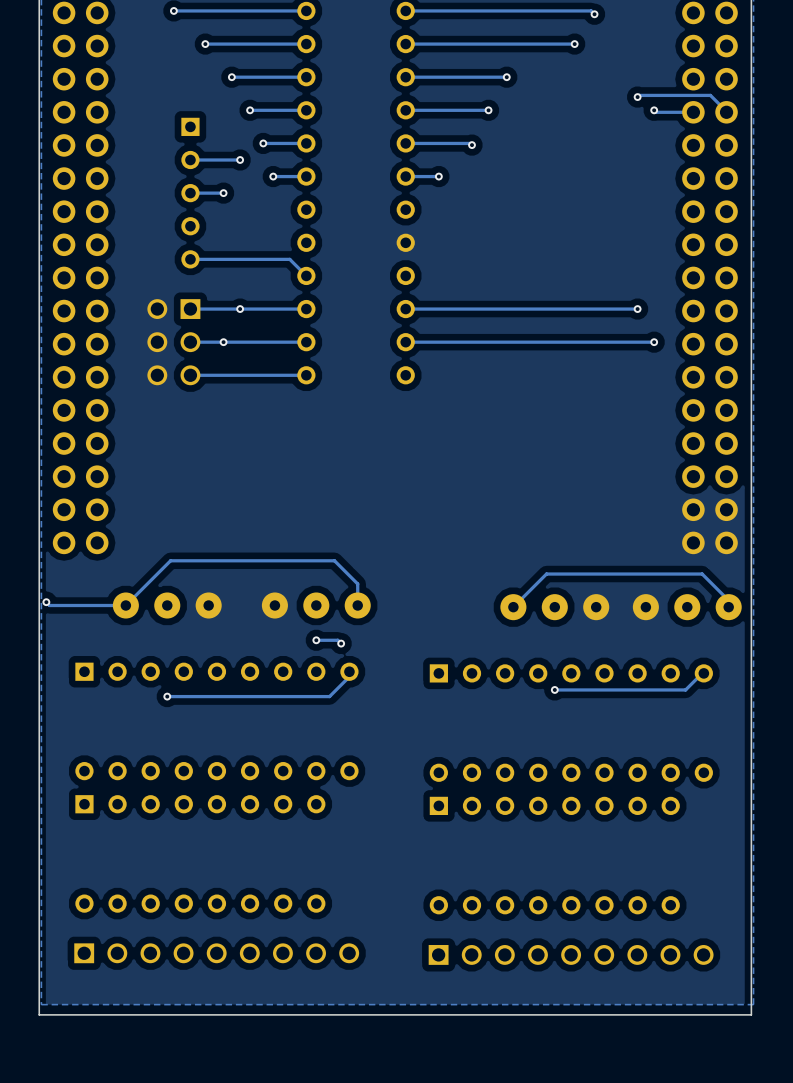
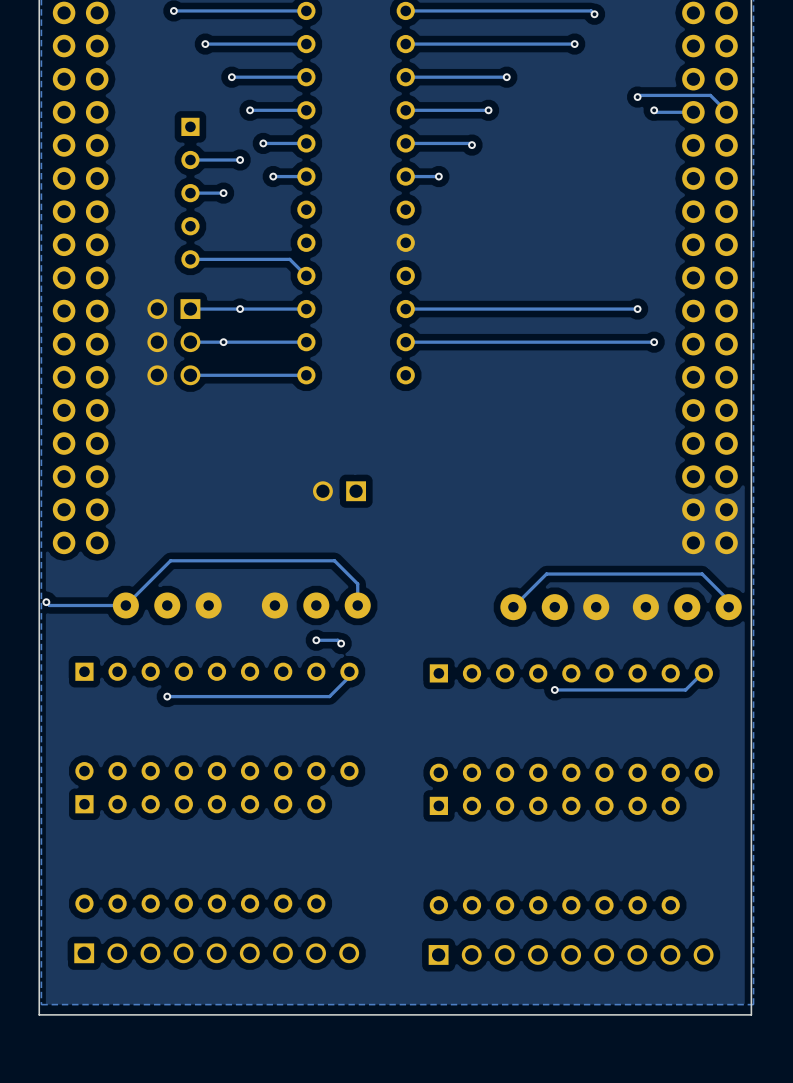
part: none -> (339, 491)

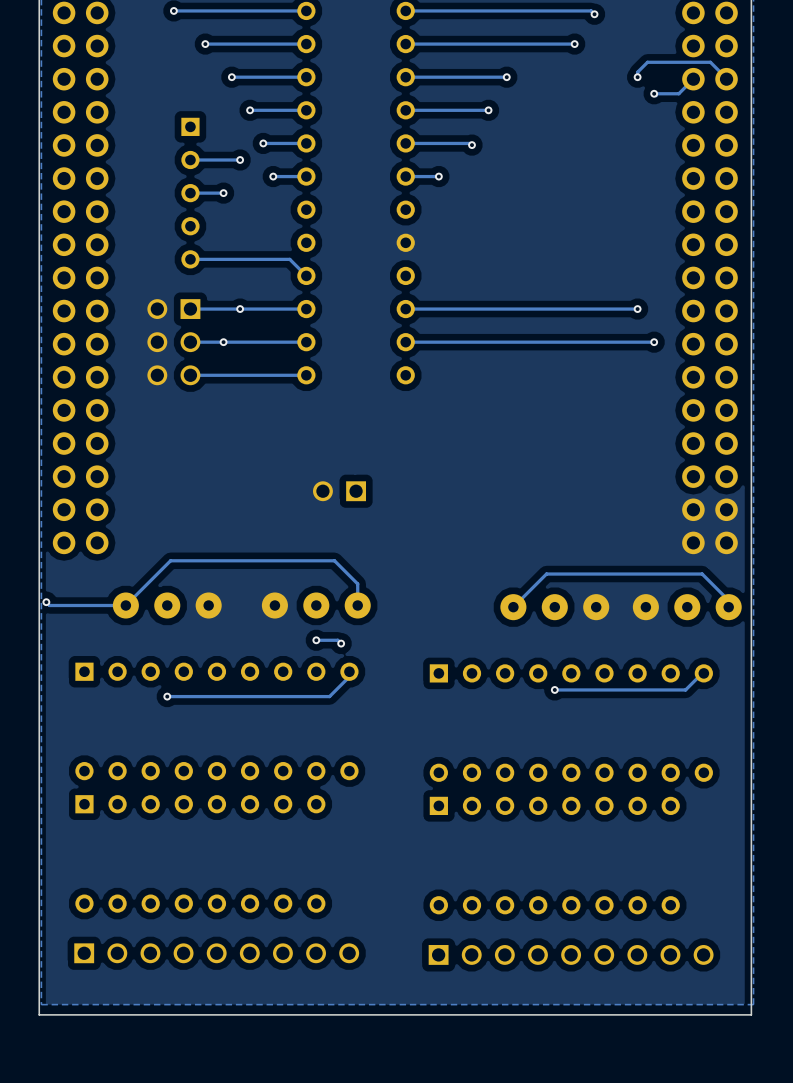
track: none -> (637, 77) (637, 72) (647, 62) (710, 62) (726, 79)
via: none -> (637, 77)
track: none -> (693, 79) (678, 93) (654, 93) (656, 95)
via: none -> (654, 93)
track: (637, 97) (639, 95) (710, 95) (726, 112) -> none
via: (637, 97) -> none
track: (654, 110) (656, 112) (693, 112) -> none
via: (654, 110) -> none

